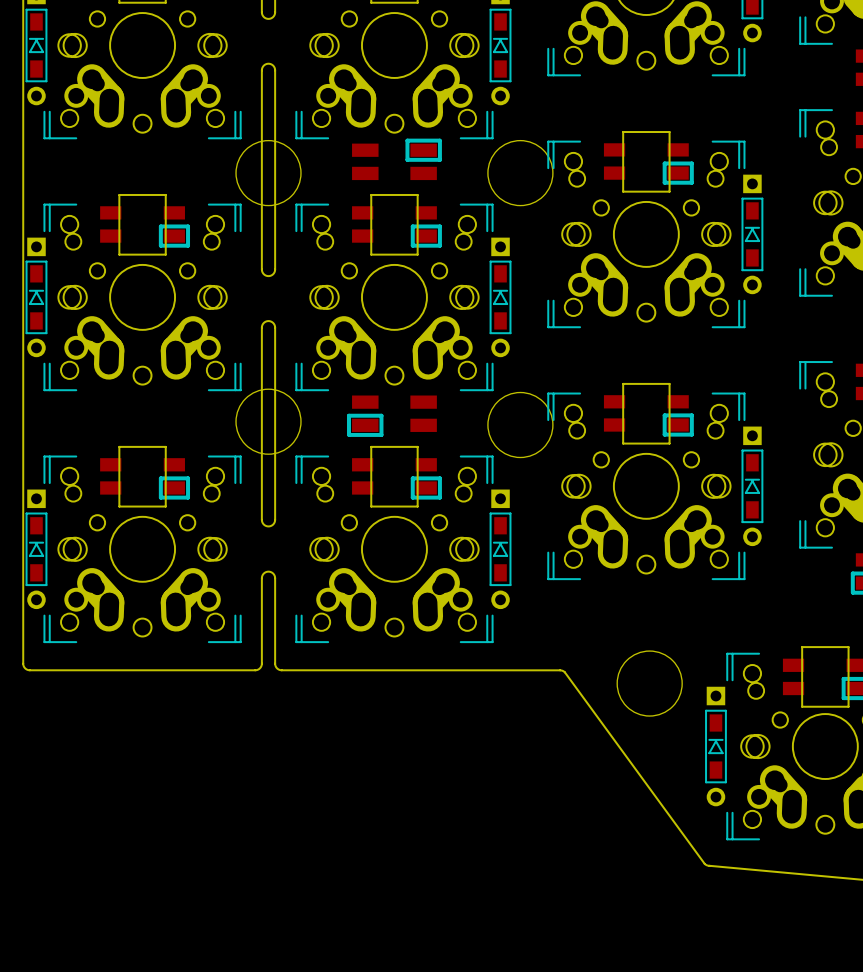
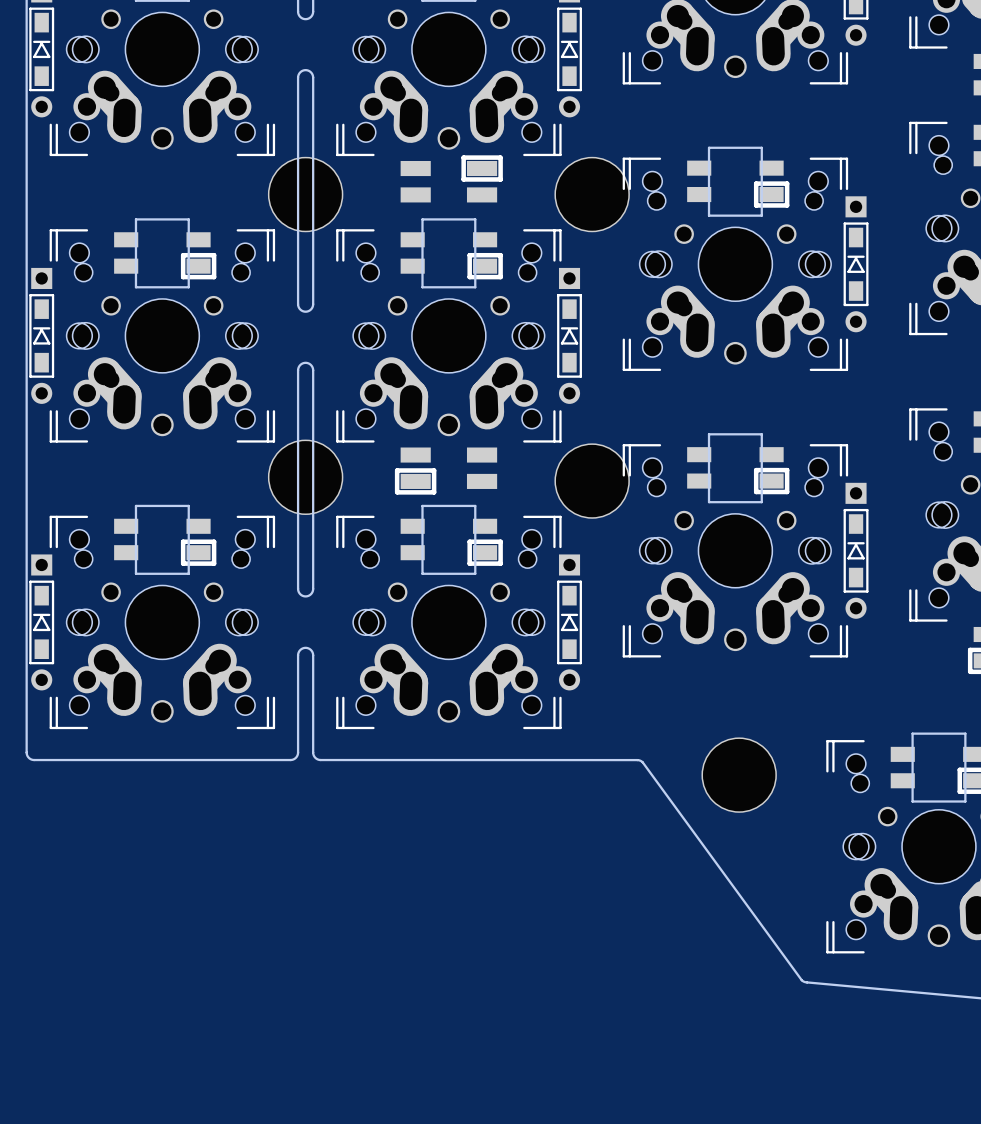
part: (715, 746) -> none

